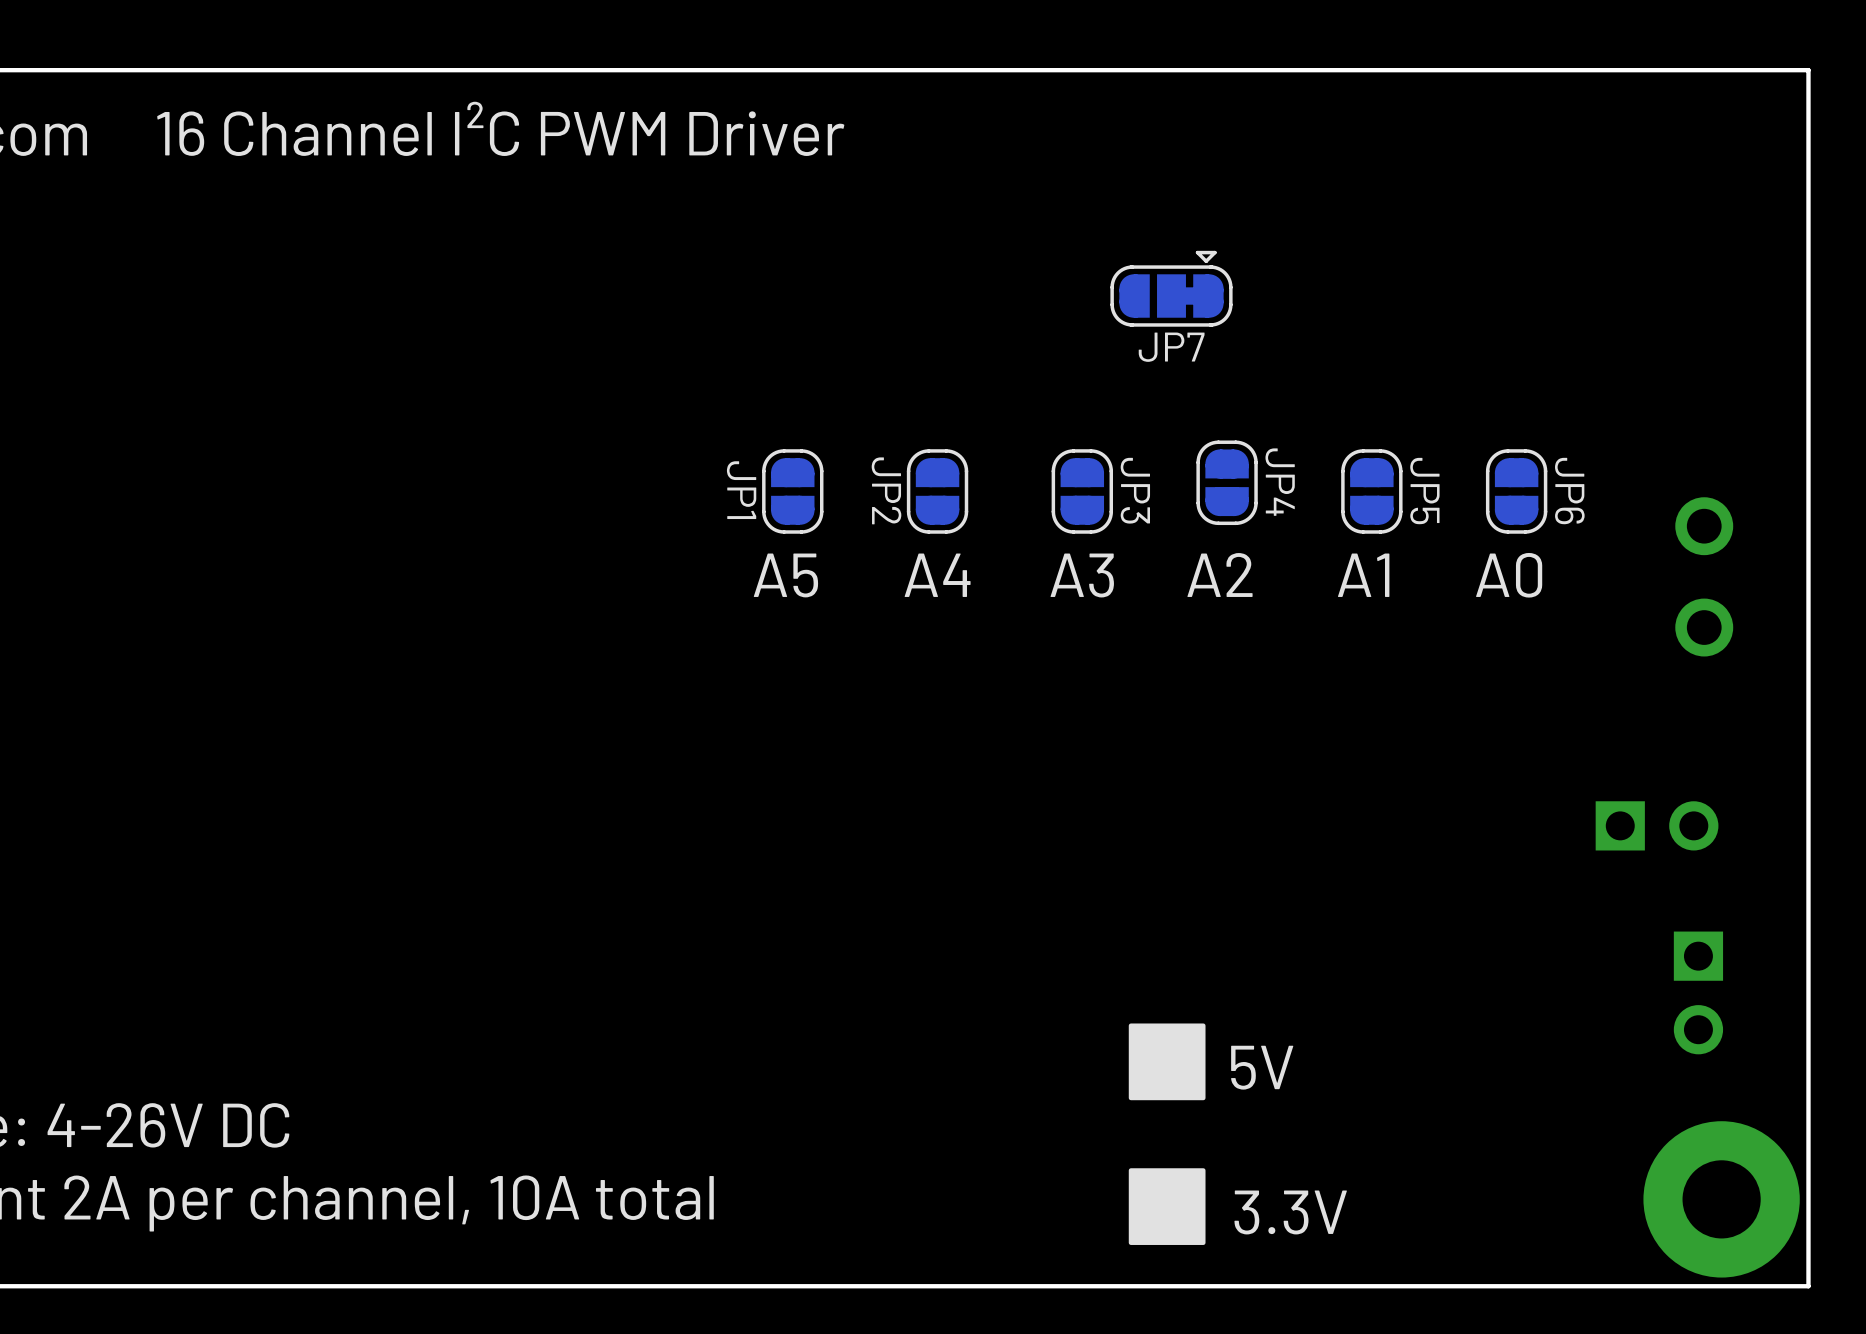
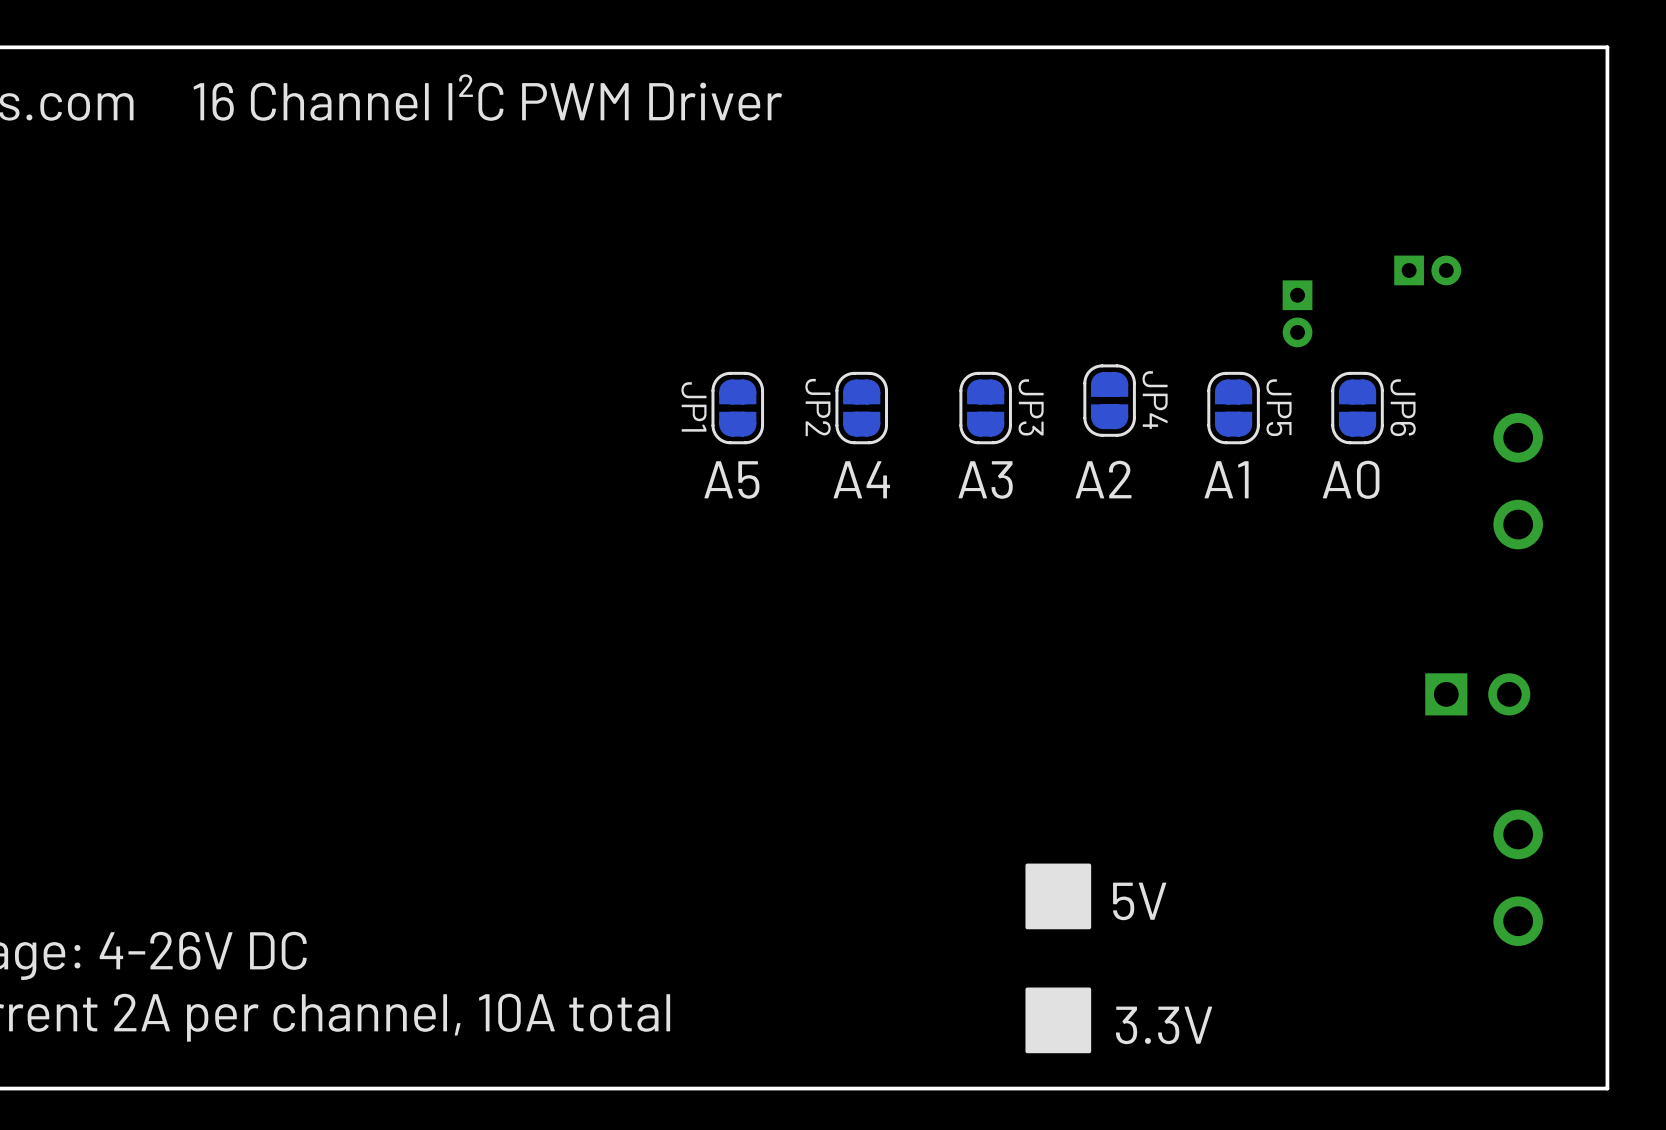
JP7: (1171, 288) -> none
part: none -> (1427, 270)
part: none -> (1297, 313)
part: (1698, 992) -> none
part: none -> (1518, 877)
part: (1721, 1199) -> none

